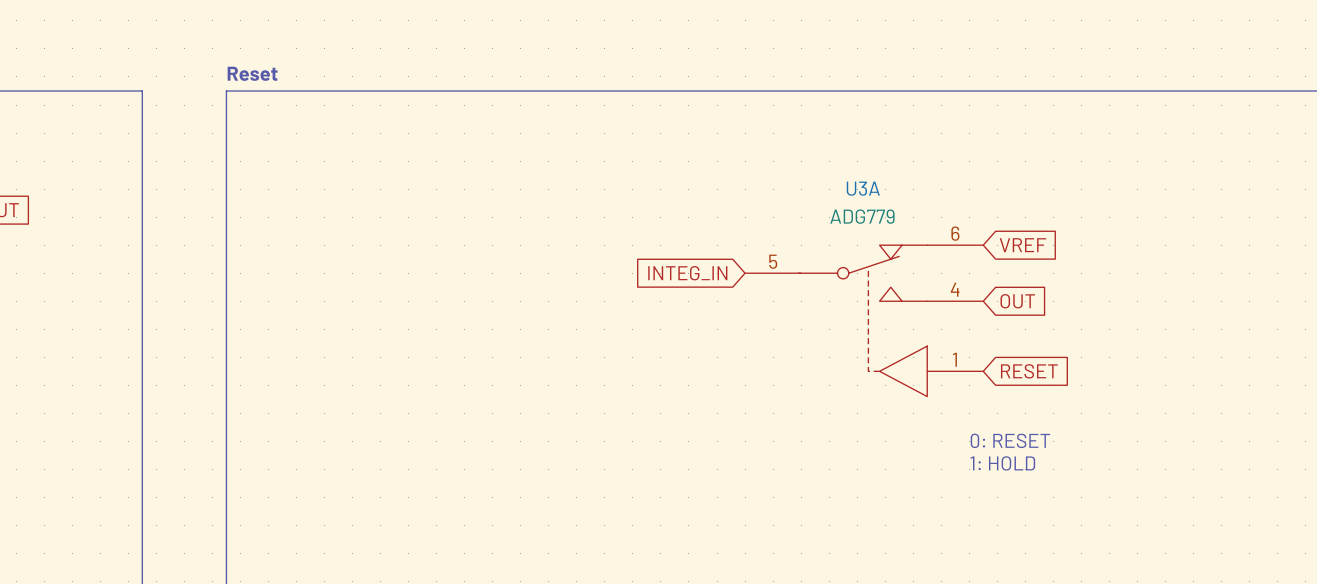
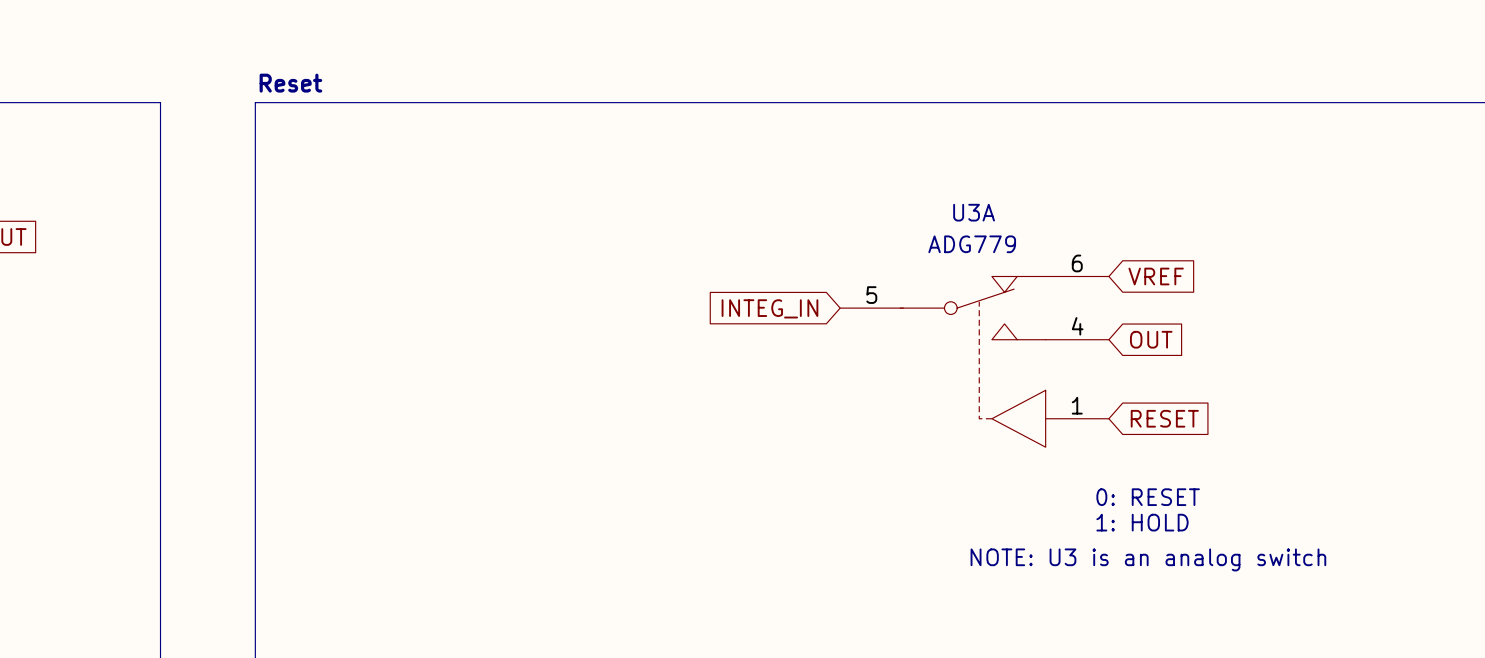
text: none -> NOTE: U3 is an analog switch (1148, 559)

